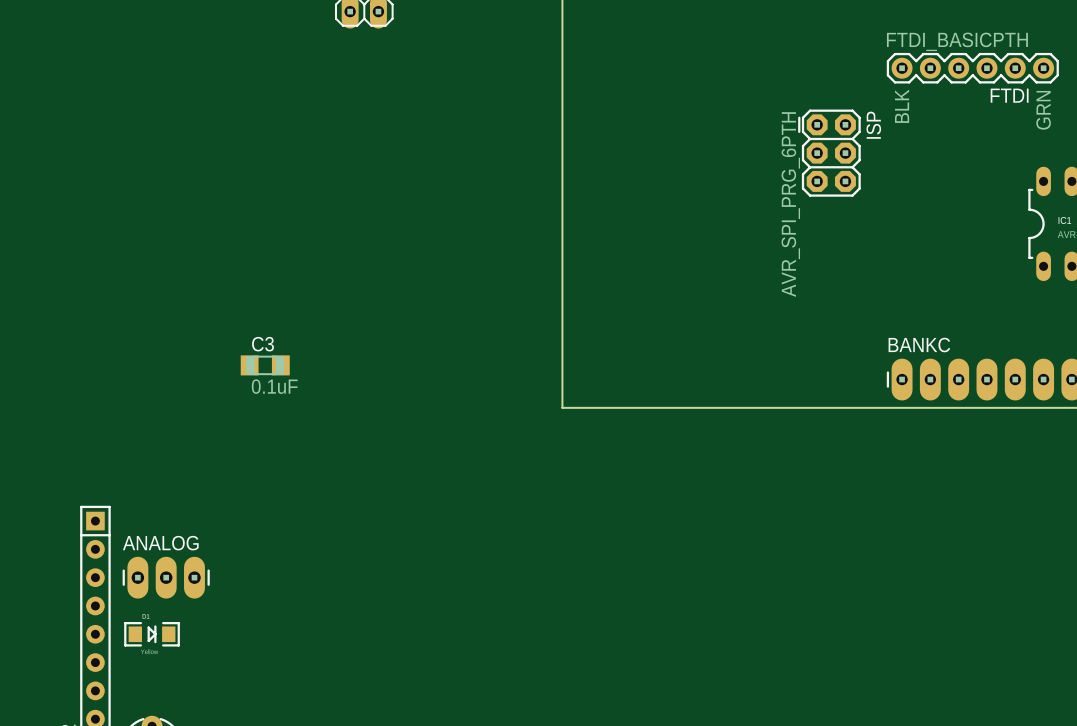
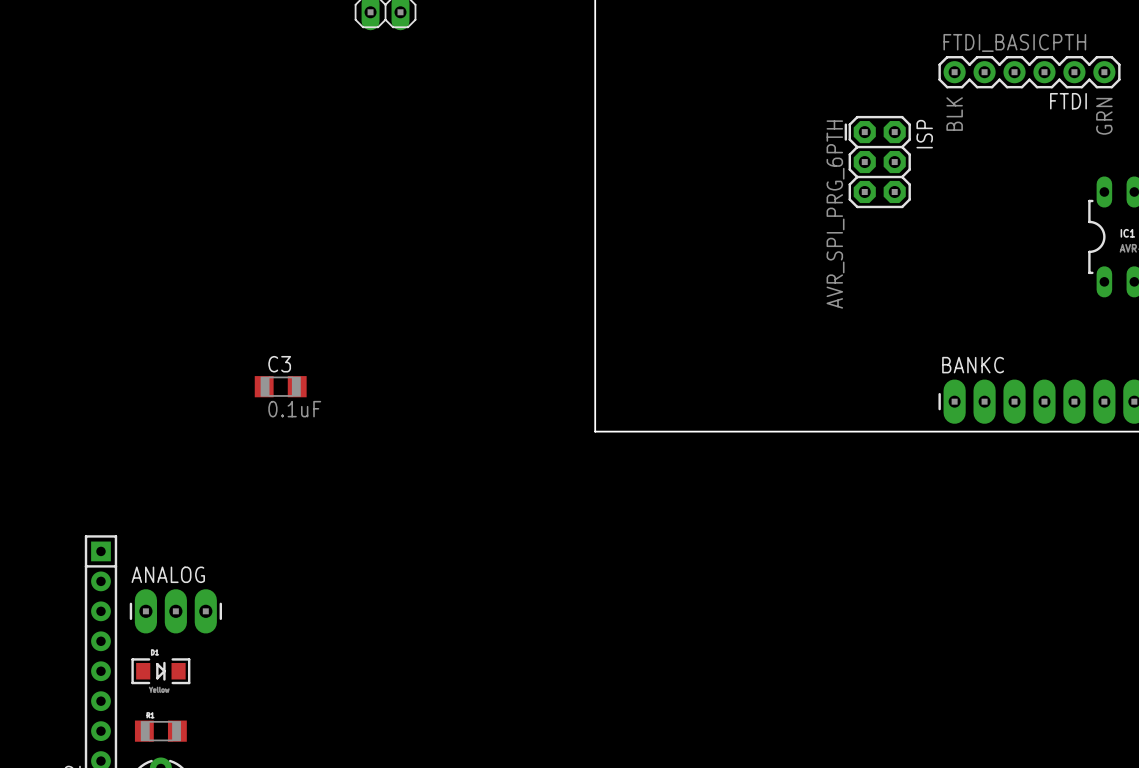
part: none -> (160, 731)

